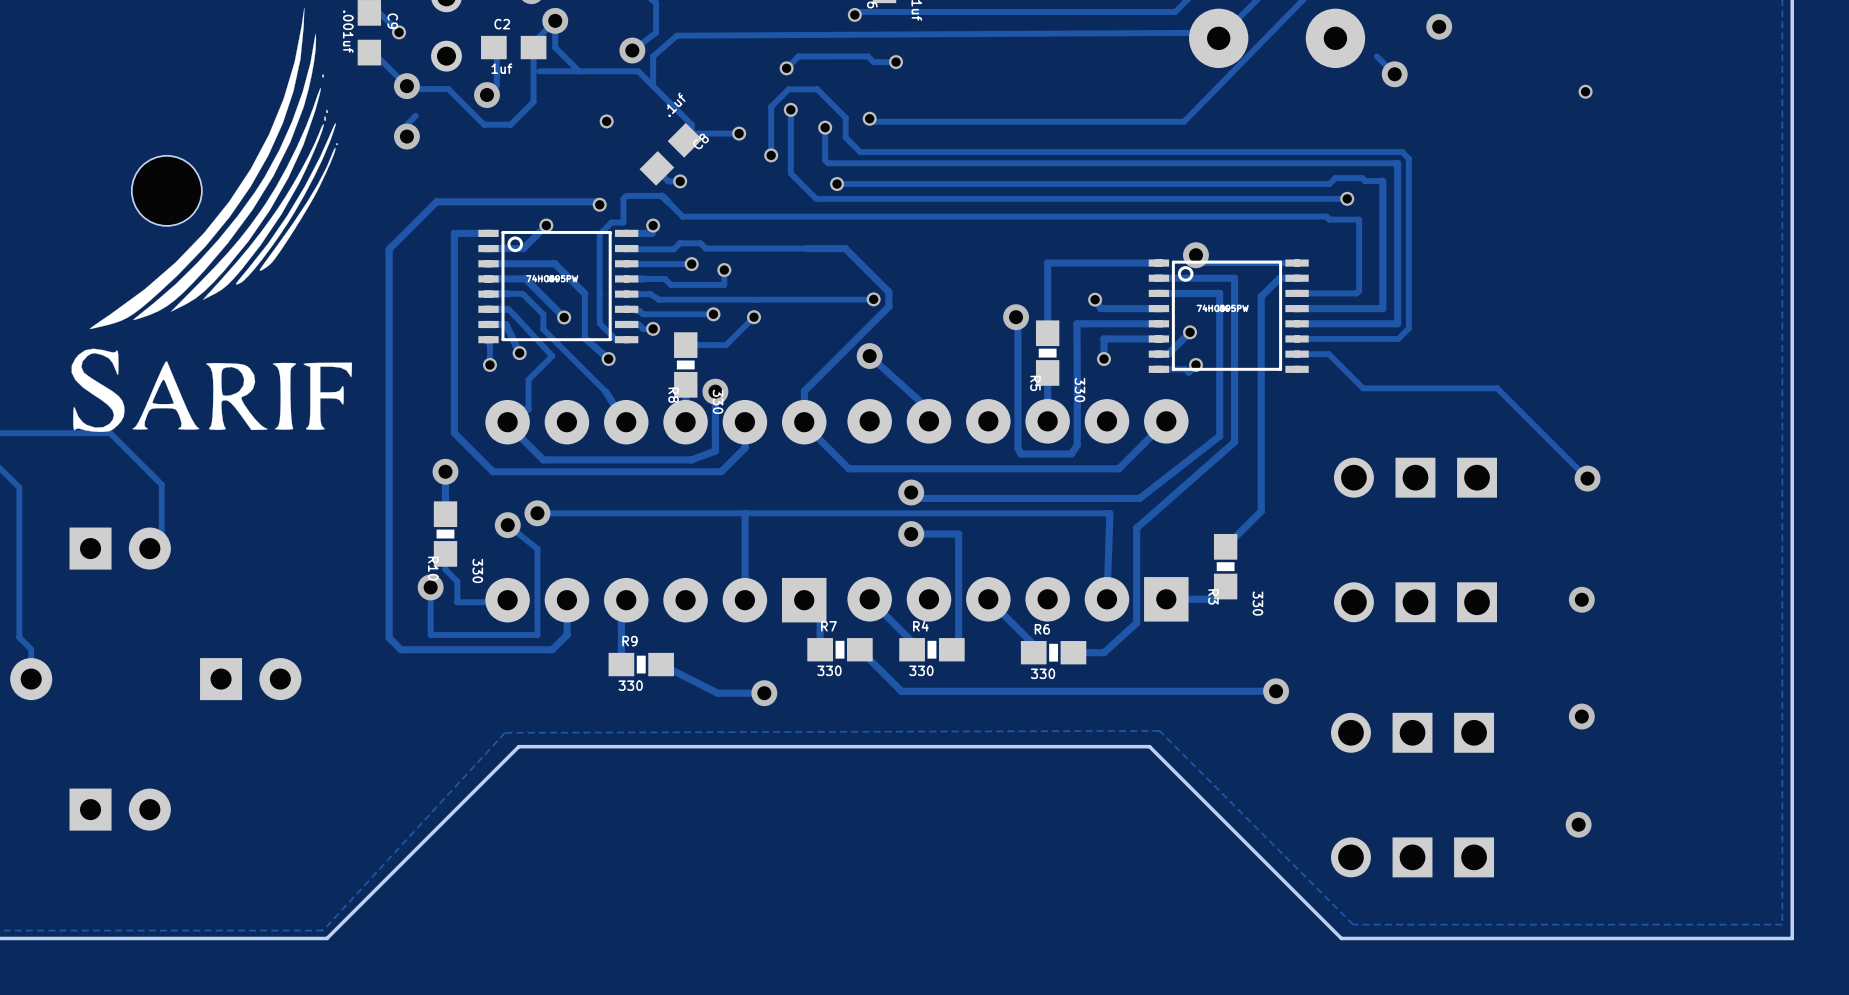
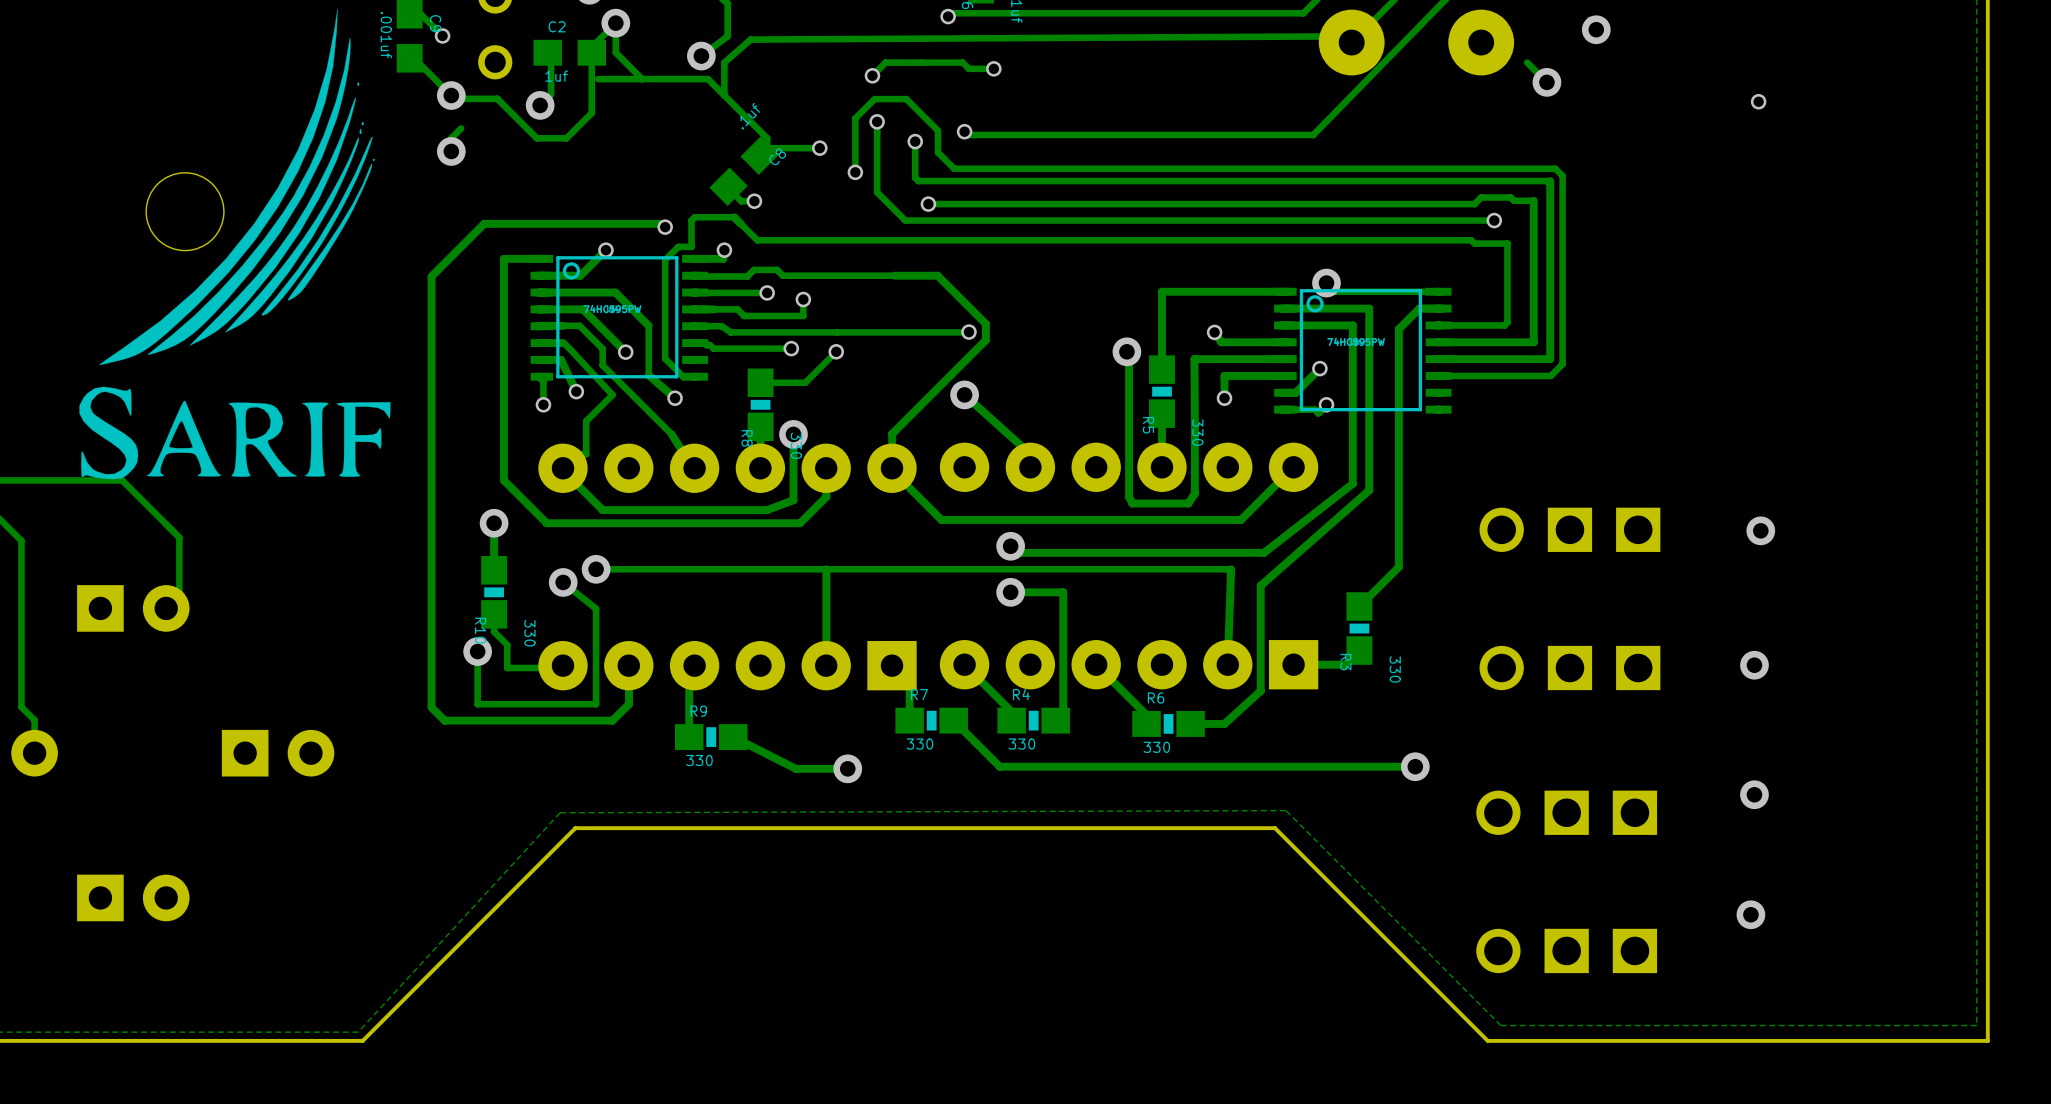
via: (606, 121) -> none
track: (636, 324) (643, 328) (653, 328) -> none
via: (653, 328) -> none
track: (1307, 354) (1328, 354) (1363, 388) (1497, 388) (1587, 478) -> none

